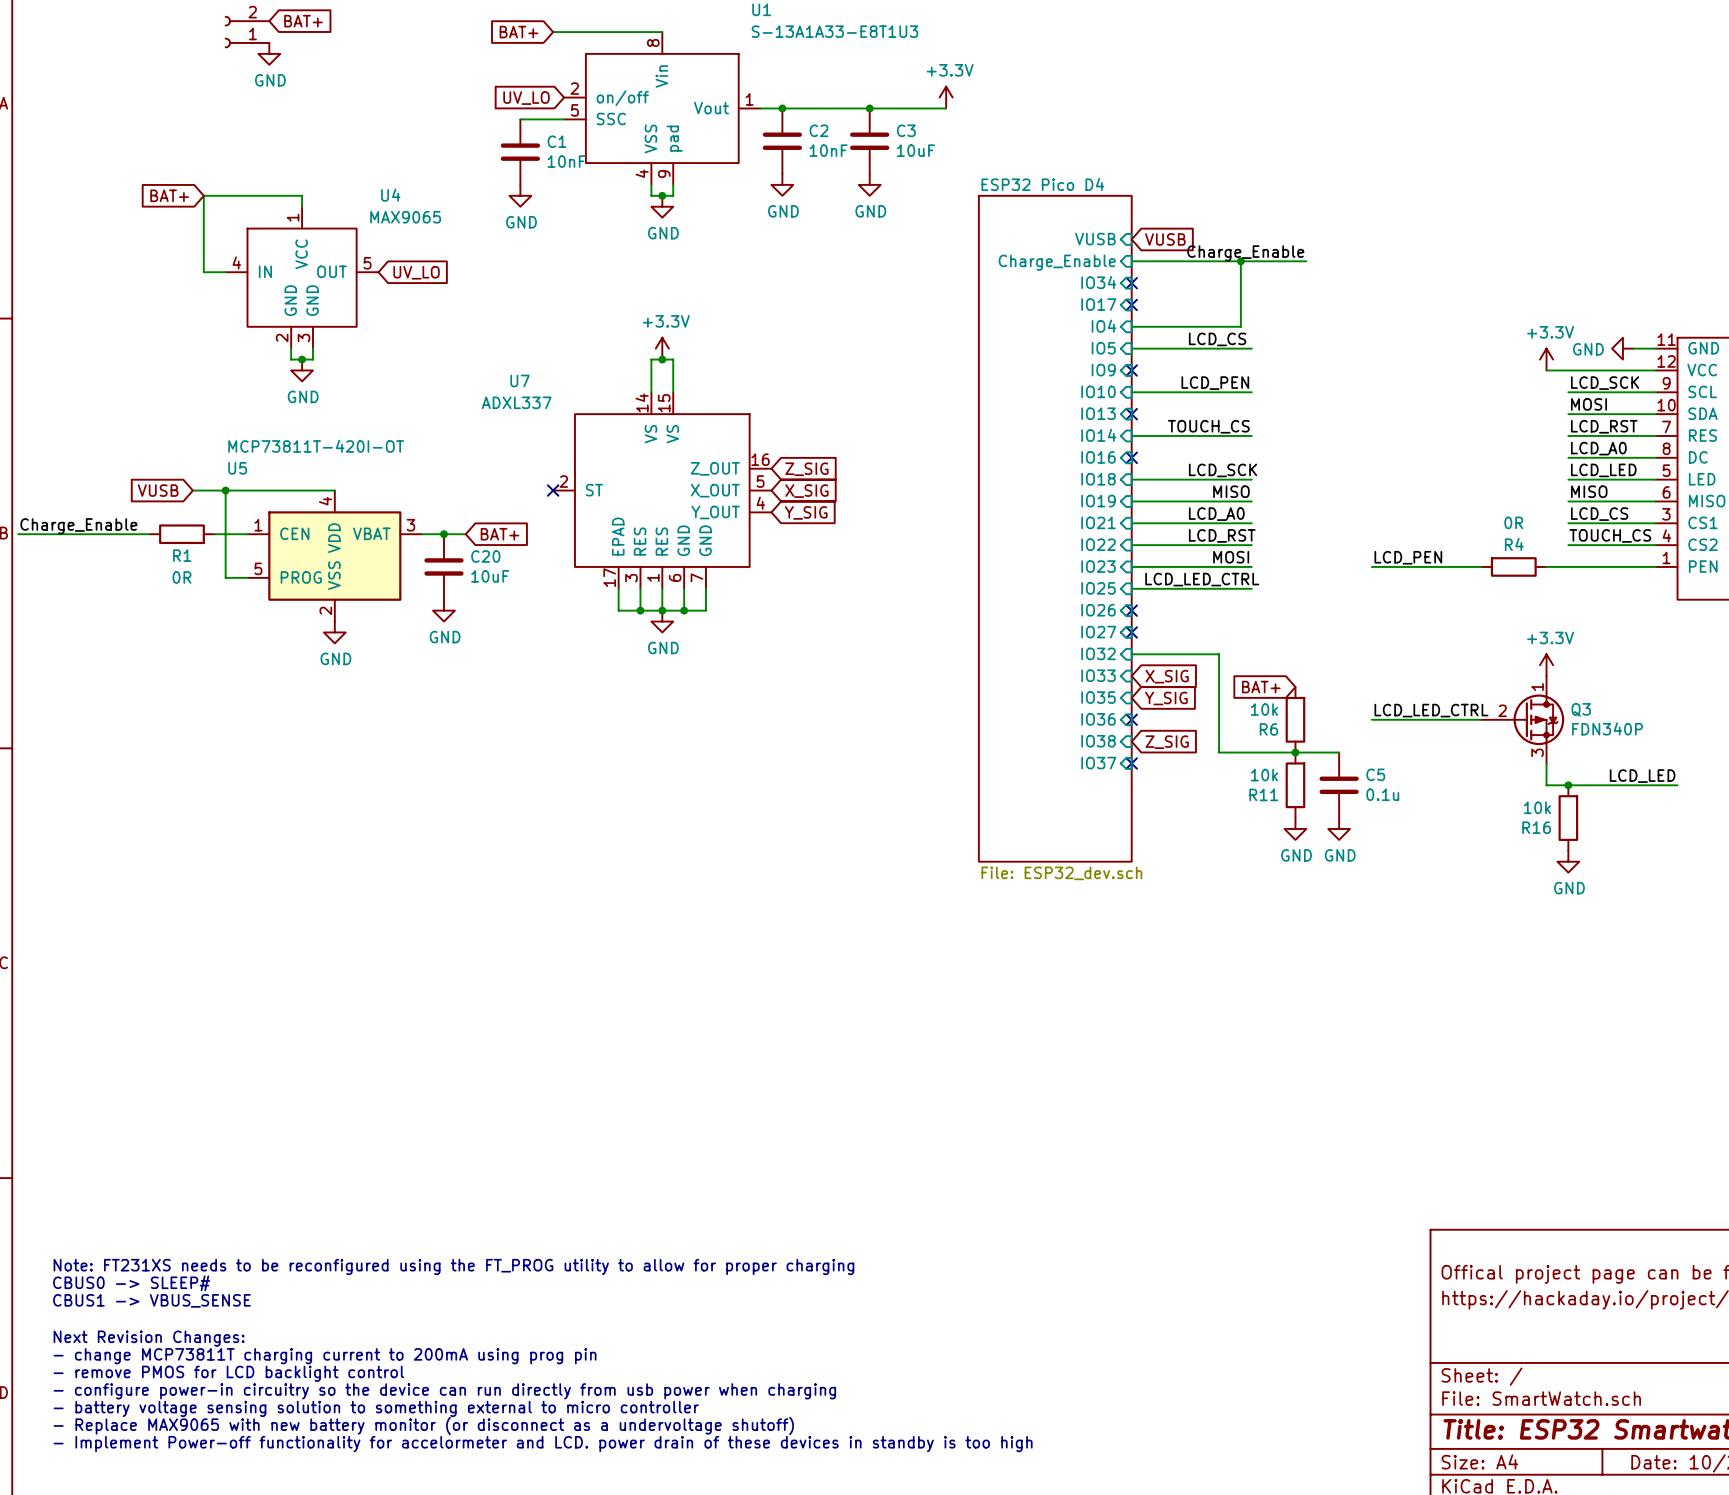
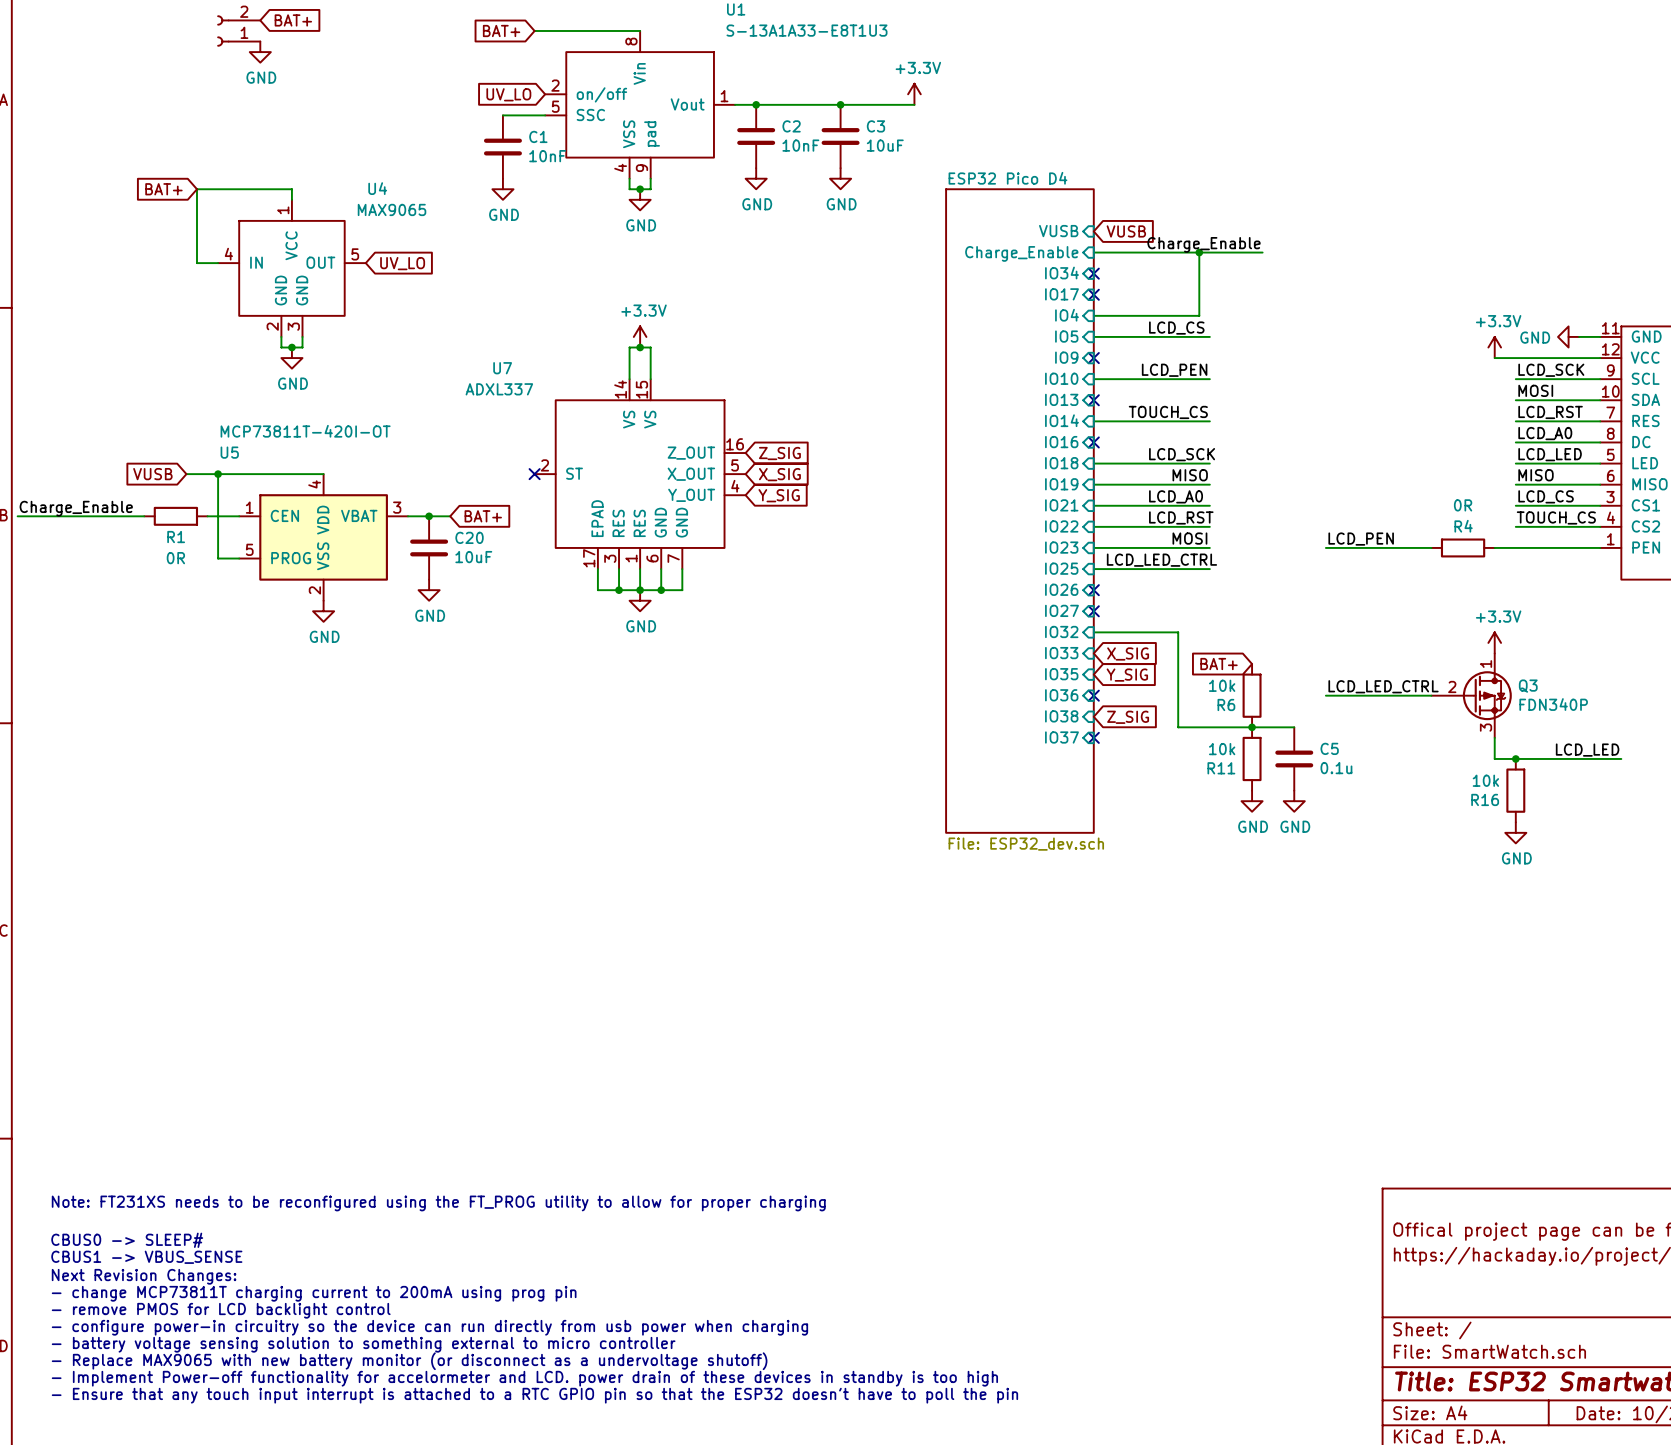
text position: Note: FT231XS needs to be reconfigured using the FT_PROG utility to allow for proper charging (453, 1267) -> Note: FT231XS needs to be reconfigured using the FT_PROG utility to allow for proper charging (438, 1203)
text: none -> Next Revision Changes: (144, 1276)
text: Next Revision Changes: (149, 1338) -> - change MCP73811T charging current to 200mA using prog pin (314, 1293)
text: - change MCP73811T charging current to 200mA using prog pin (325, 1356) -> - remove PMOS for LCD backlight control (221, 1310)
text: - remove PMOS for LCD backlight control (228, 1373) -> - configure power-in circuitry so the device can run directly from usb power when charging (429, 1327)
text: - configure power-in circuitry so the device can run directly from usb power when charging (444, 1391) -> - battery voltage sensing solution to something external to micro controller (363, 1344)
text: - battery voltage sensing solution to something external to micro controller (376, 1408) -> - Replace MAX9065 with new battery monitor (or disconnect as a undervoltage shutoff) (409, 1361)
text: - Replace MAX9065 with new battery monitor (or disconnect as a undervoltage shutoff) (423, 1425) -> - Implement Power-off functionality for accelormeter and LCD. power drain of these devices in standby is too high (524, 1378)
text: - Implement Power-off functionality for accelormeter and LCD. power drain of these devices in standby is too high (543, 1444) -> - Ensure that any touch input interrupt is attached to a RTC GPIO pin so that the ESP32 doesn't have to poll the pin (534, 1395)

